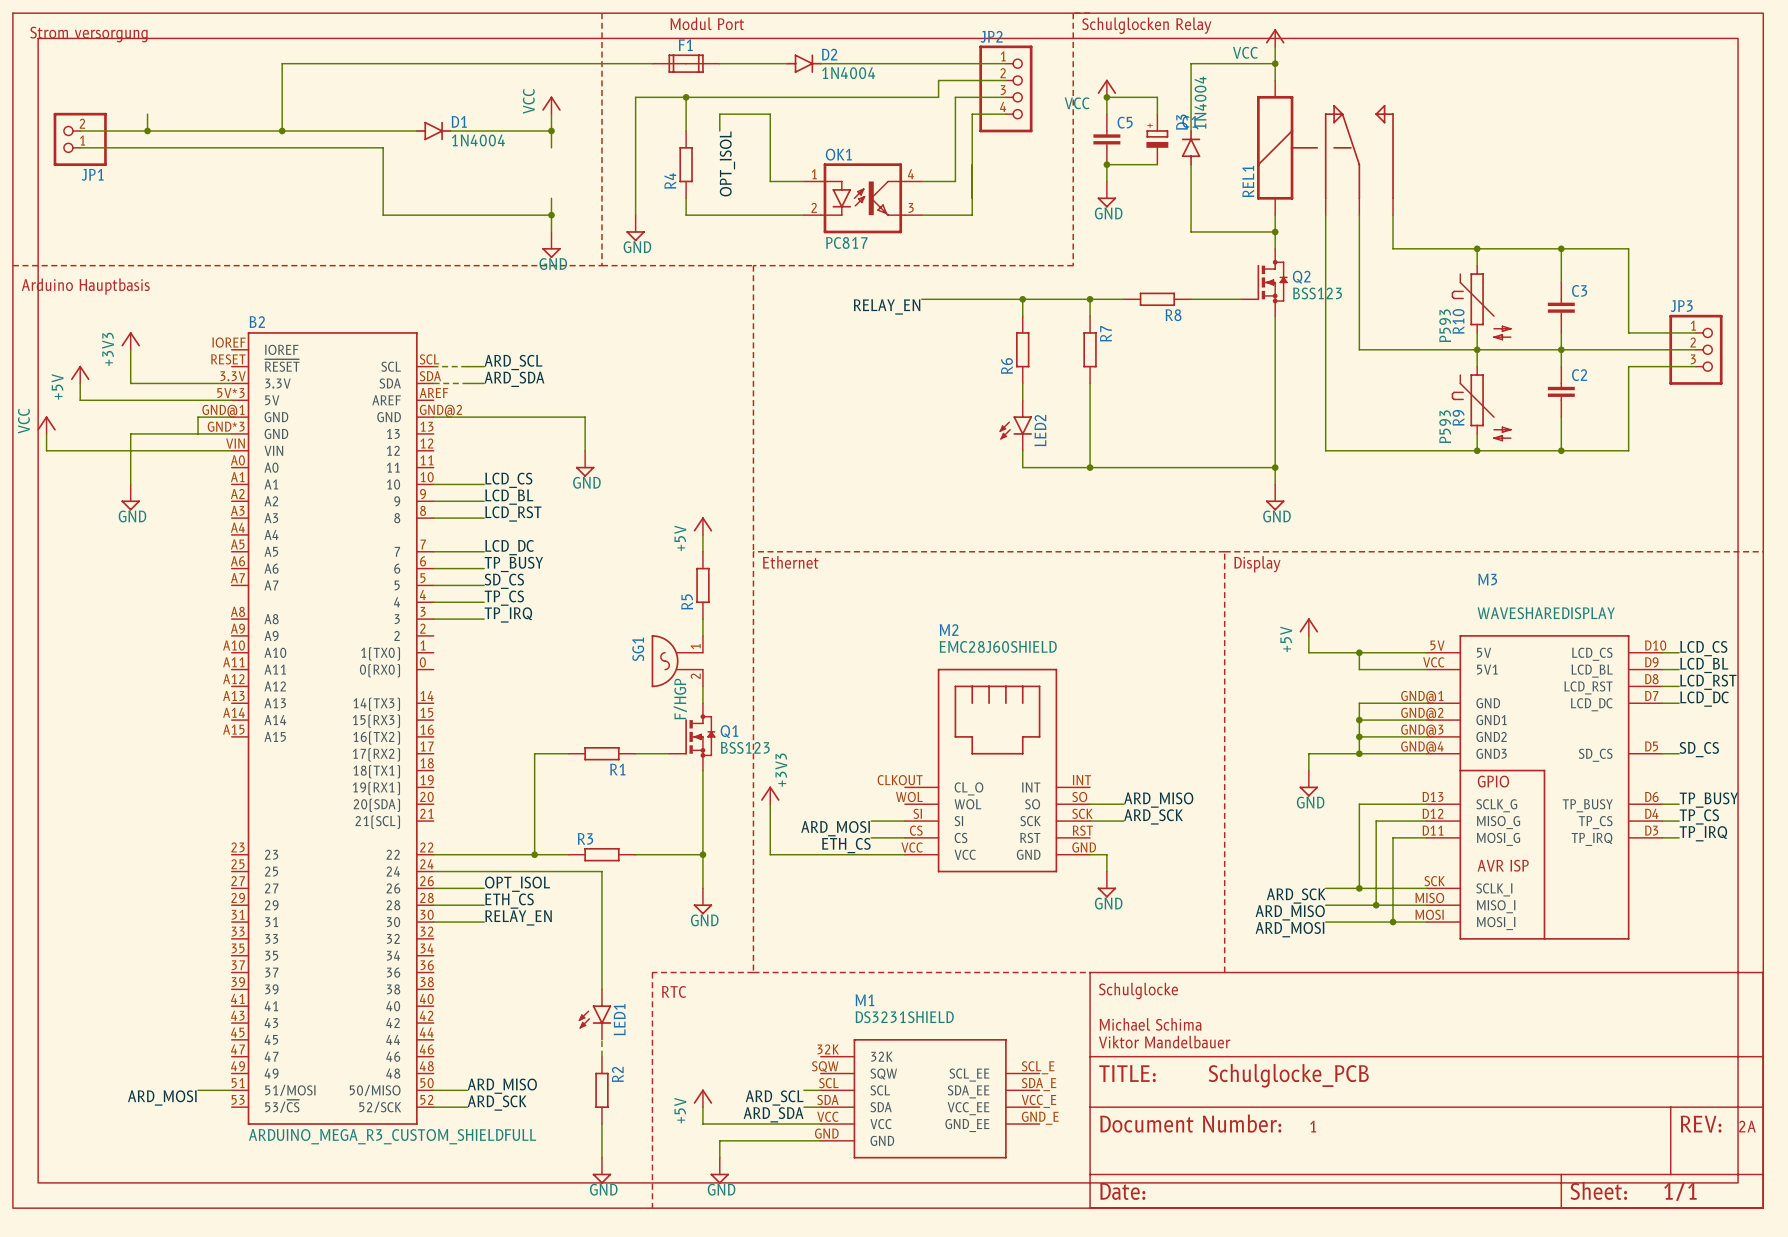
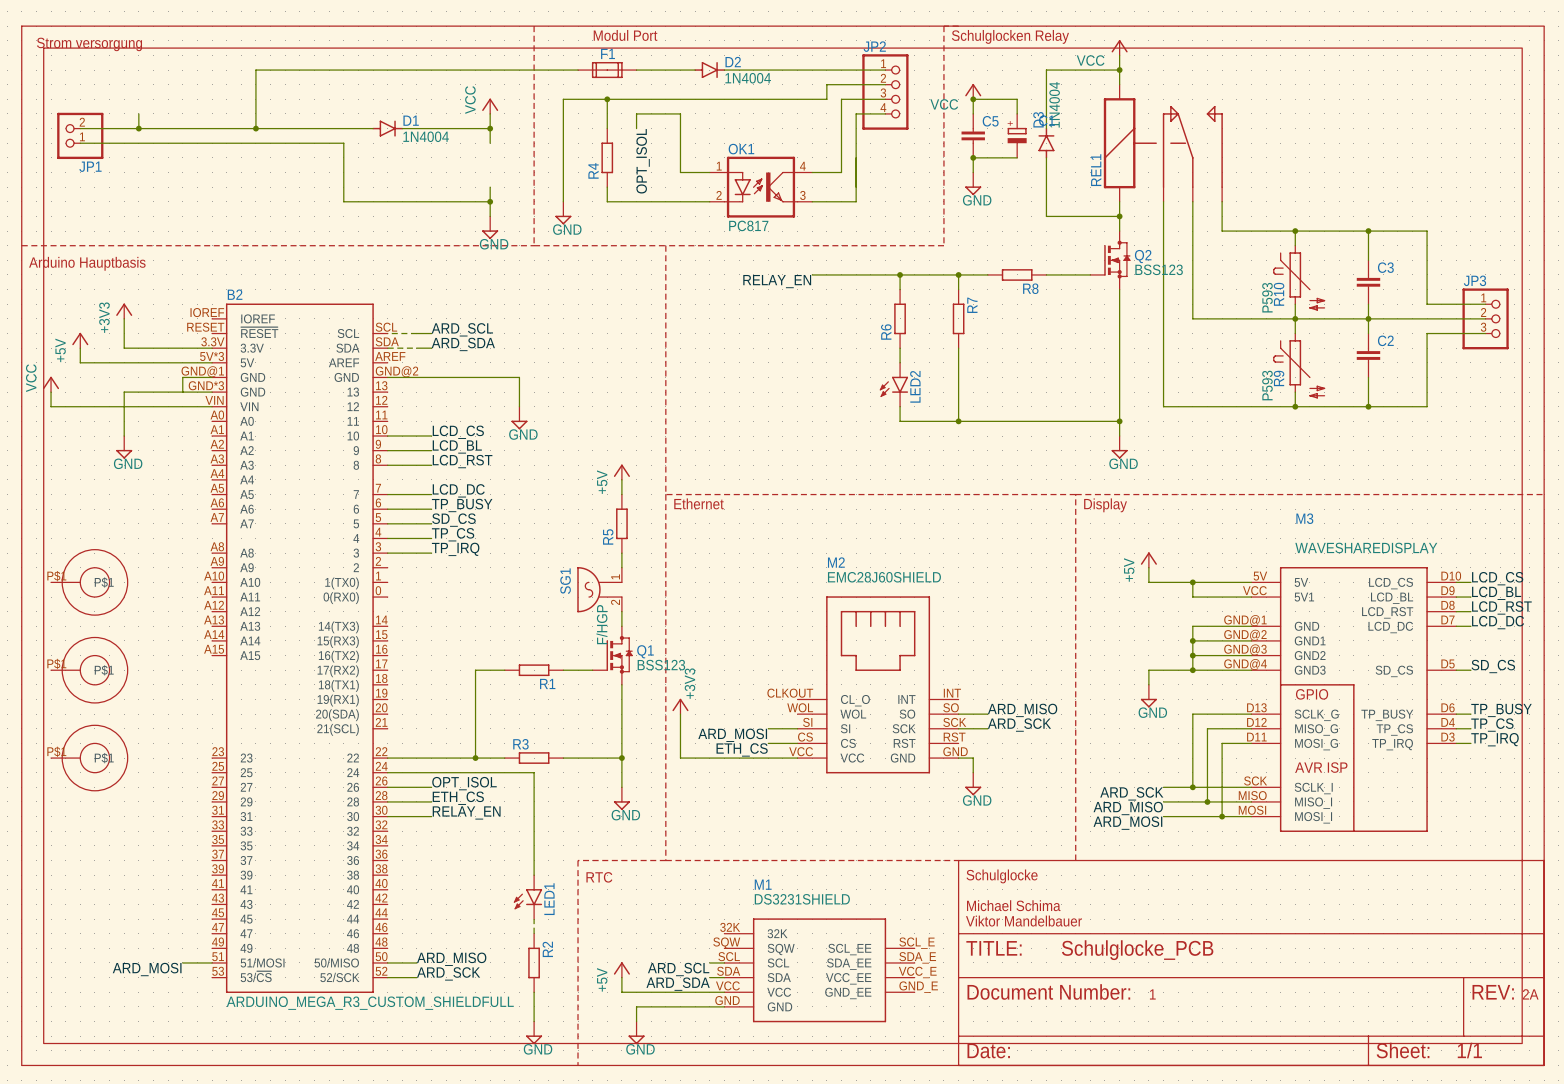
part: none -> (89, 582)
part: none -> (89, 670)
part: none -> (89, 758)

